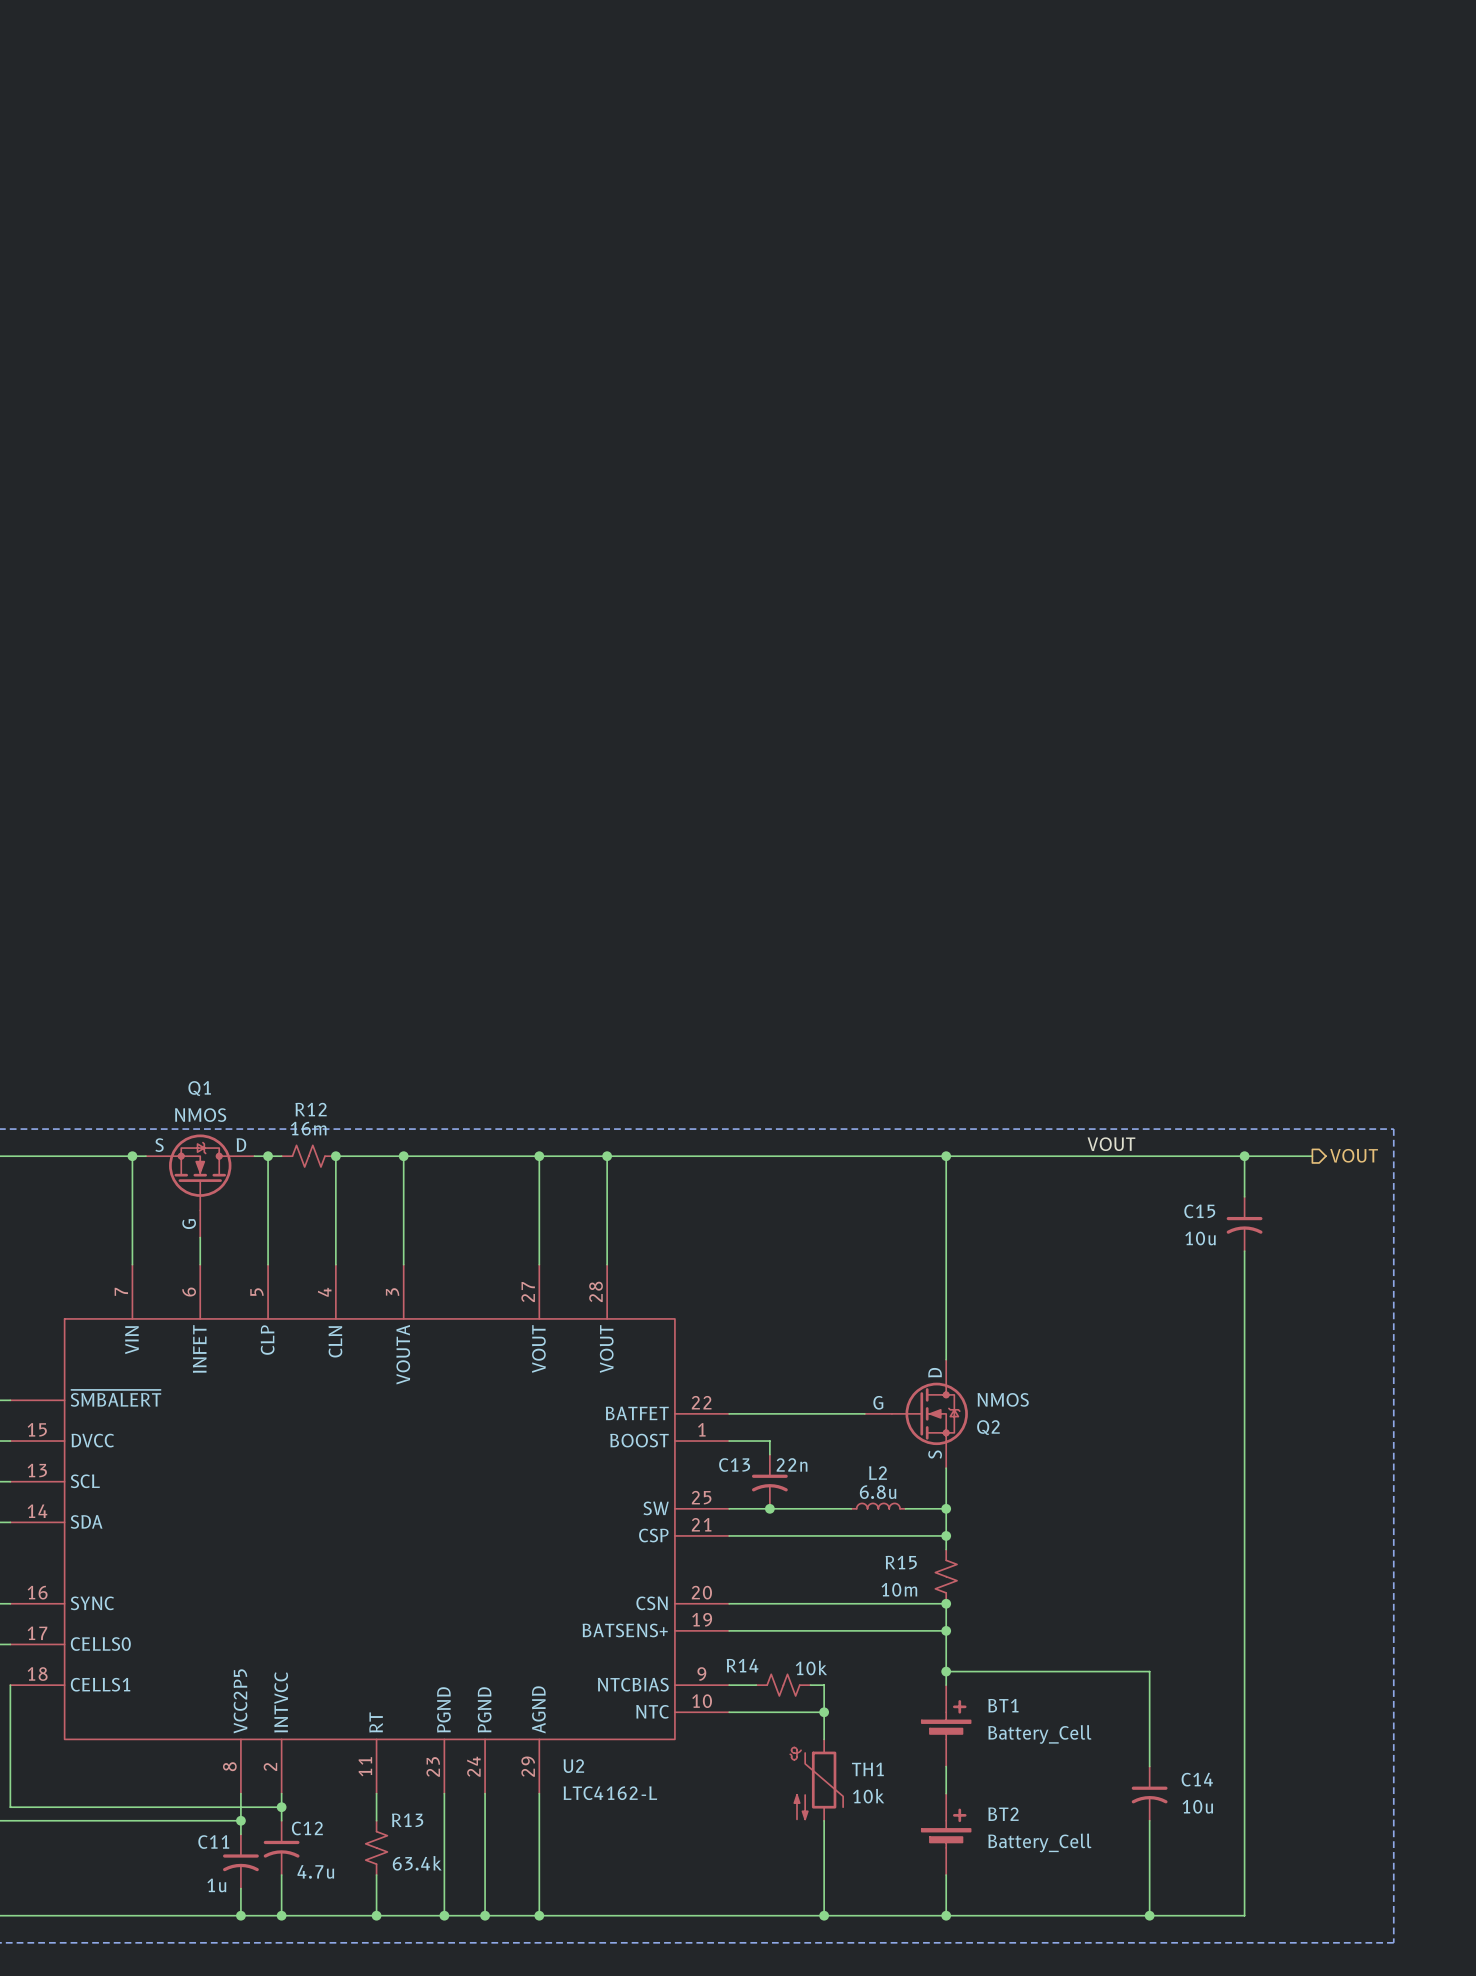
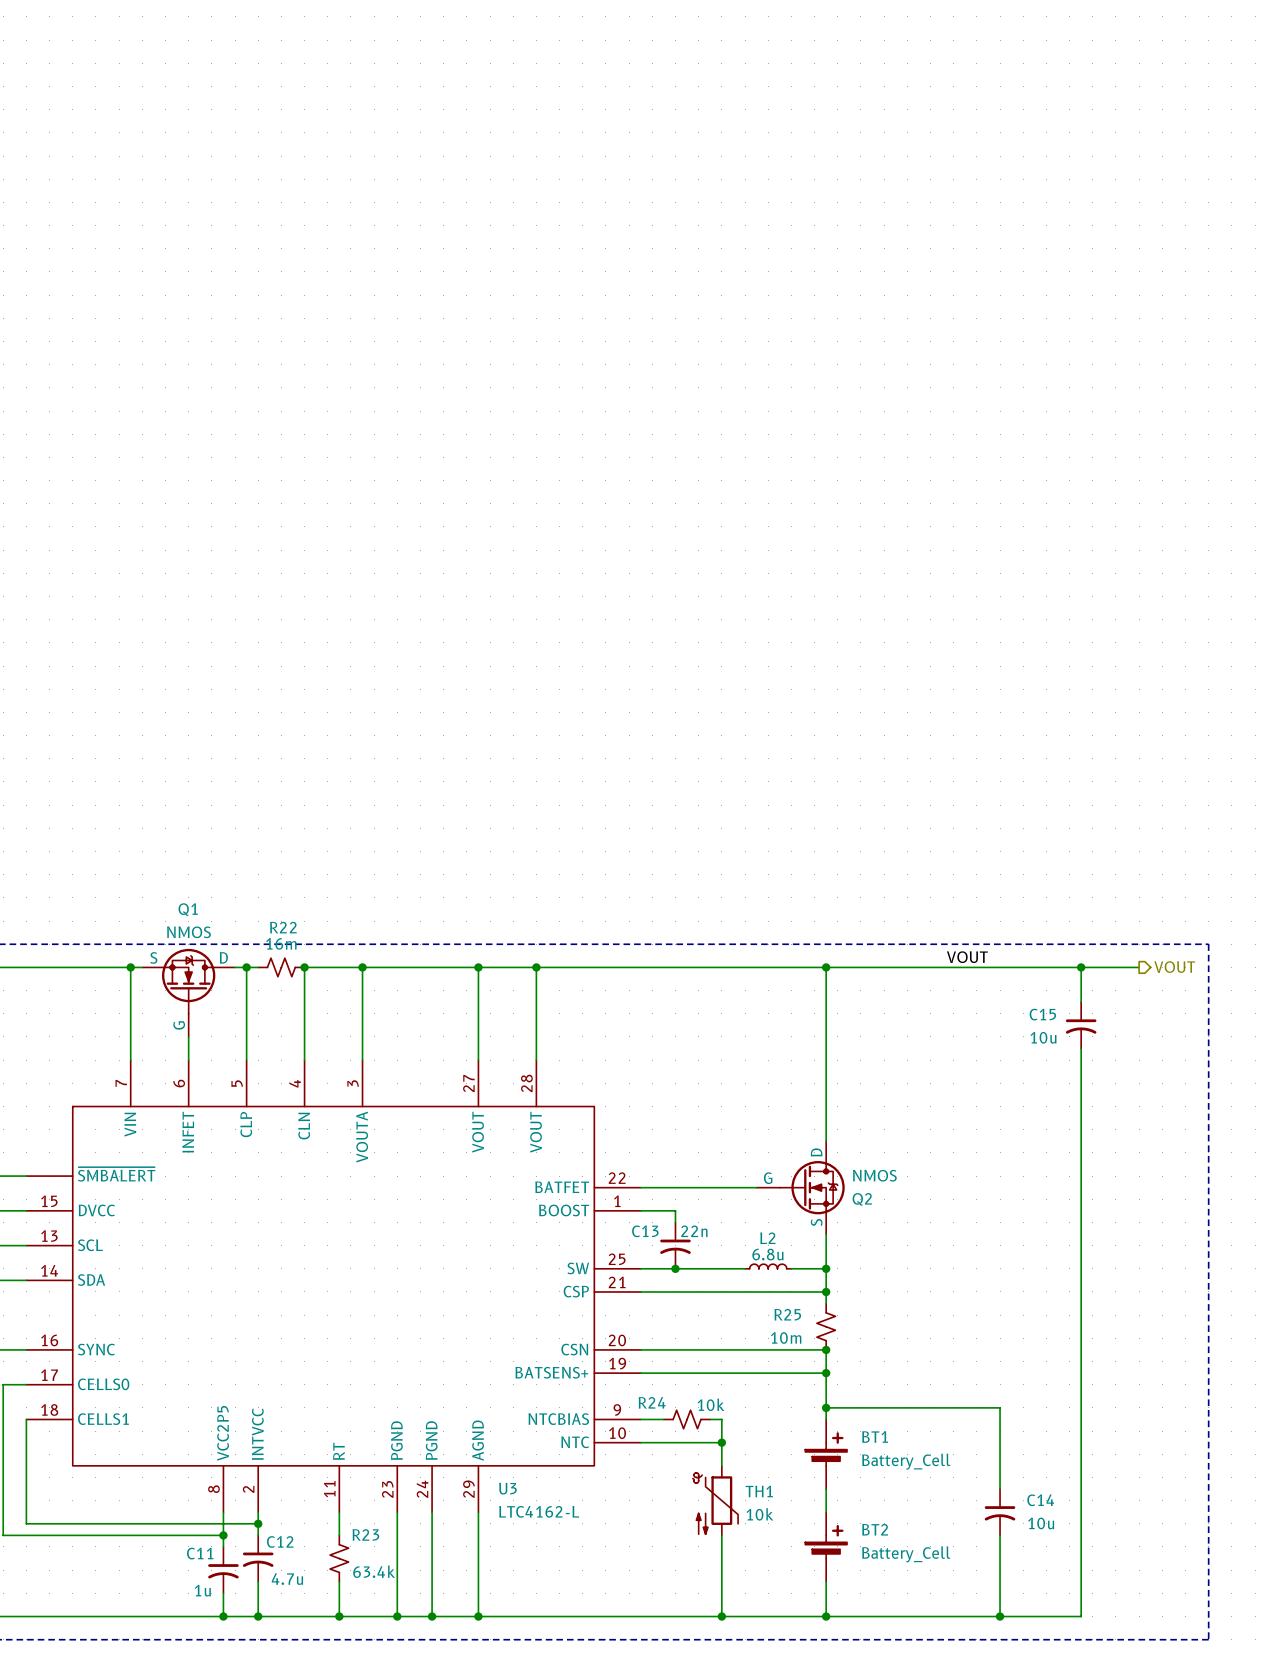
R12 name: R12 (311, 1109) -> R22 (283, 927)
R15 name: R15 (901, 1562) -> R25 (787, 1314)
R14 name: R14 (742, 1665) -> R24 (652, 1402)
U2 name: U2 (573, 1766) -> U3 (507, 1488)
R13 name: R13 (407, 1820) -> R23 (365, 1534)

